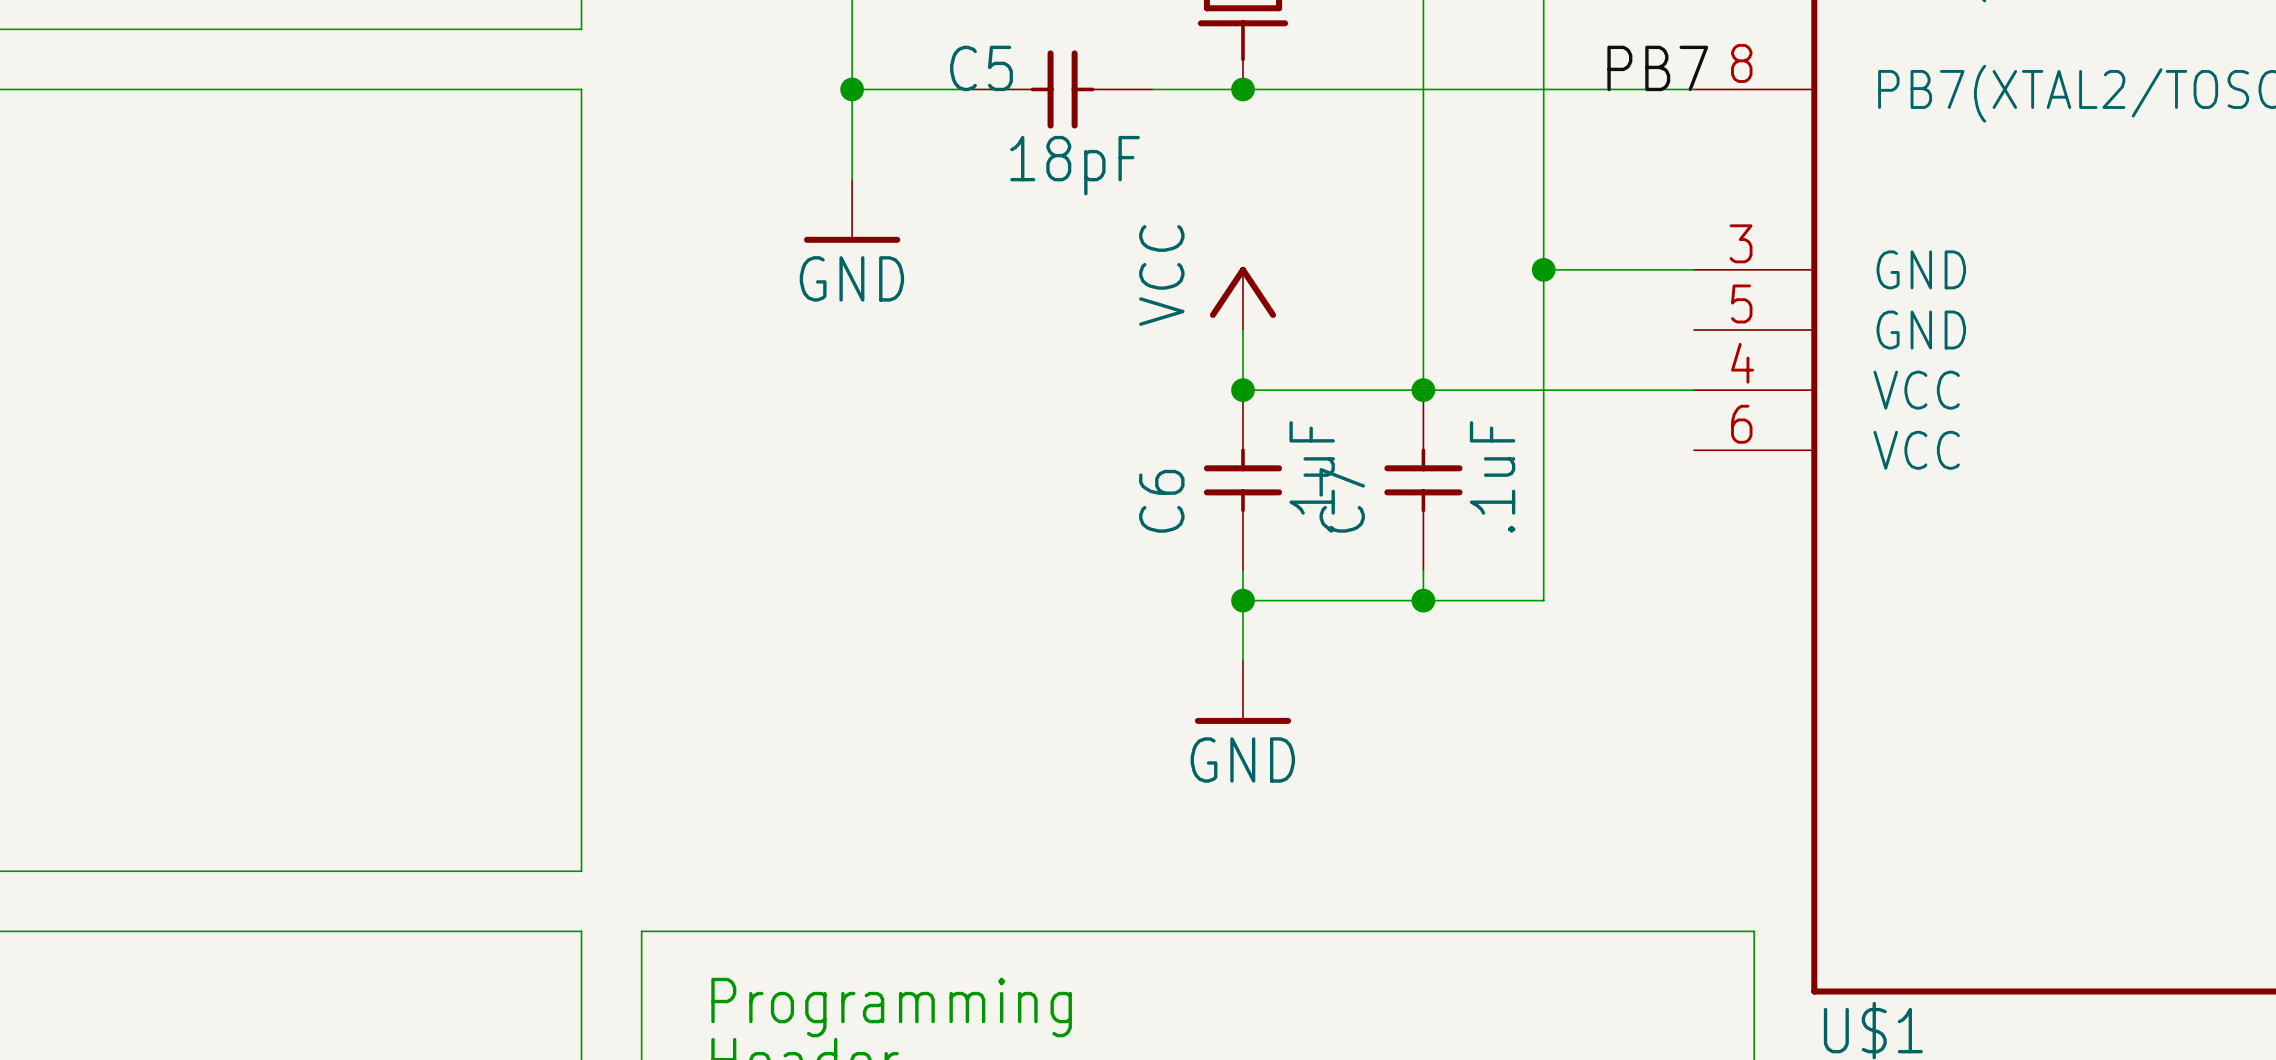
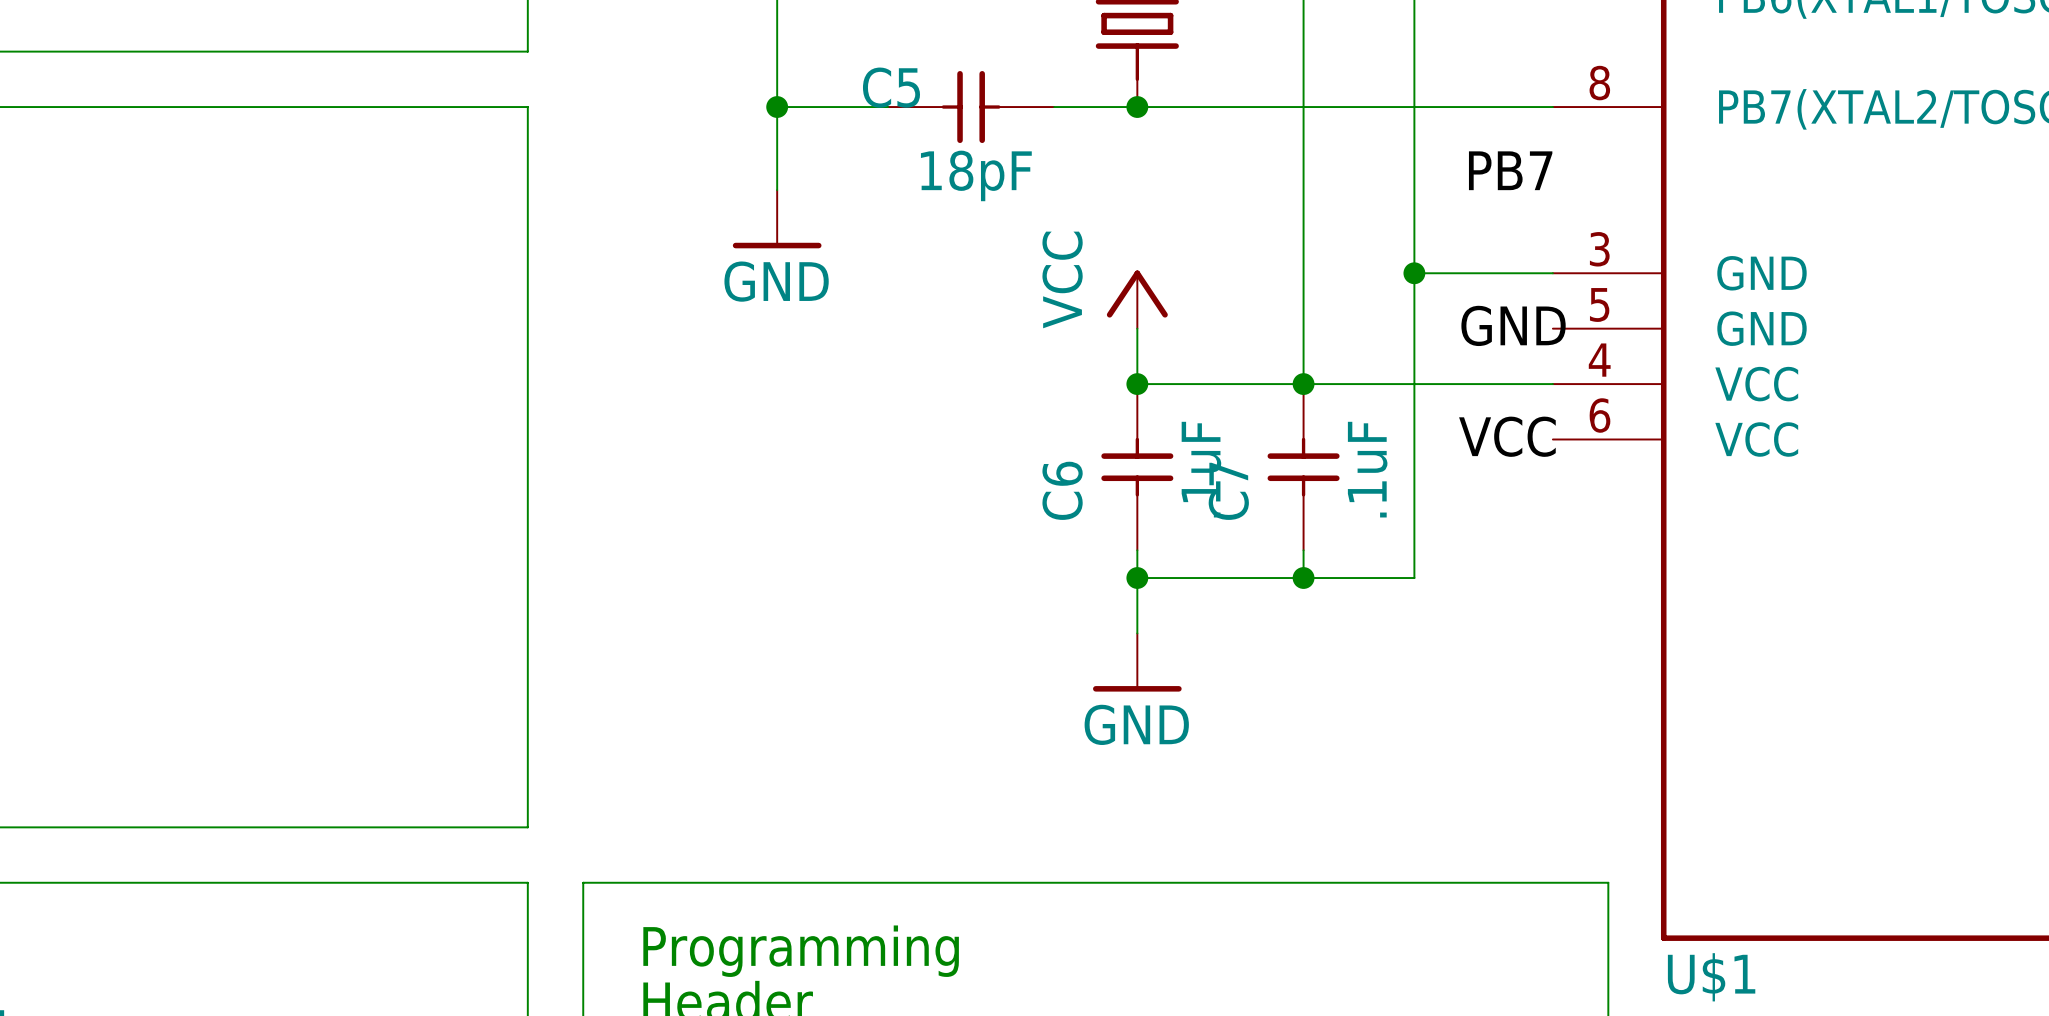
label position: PB7 (1657, 68) -> PB7 (1510, 170)
label: none -> GND (1513, 325)
label: none -> VCC (1507, 436)

